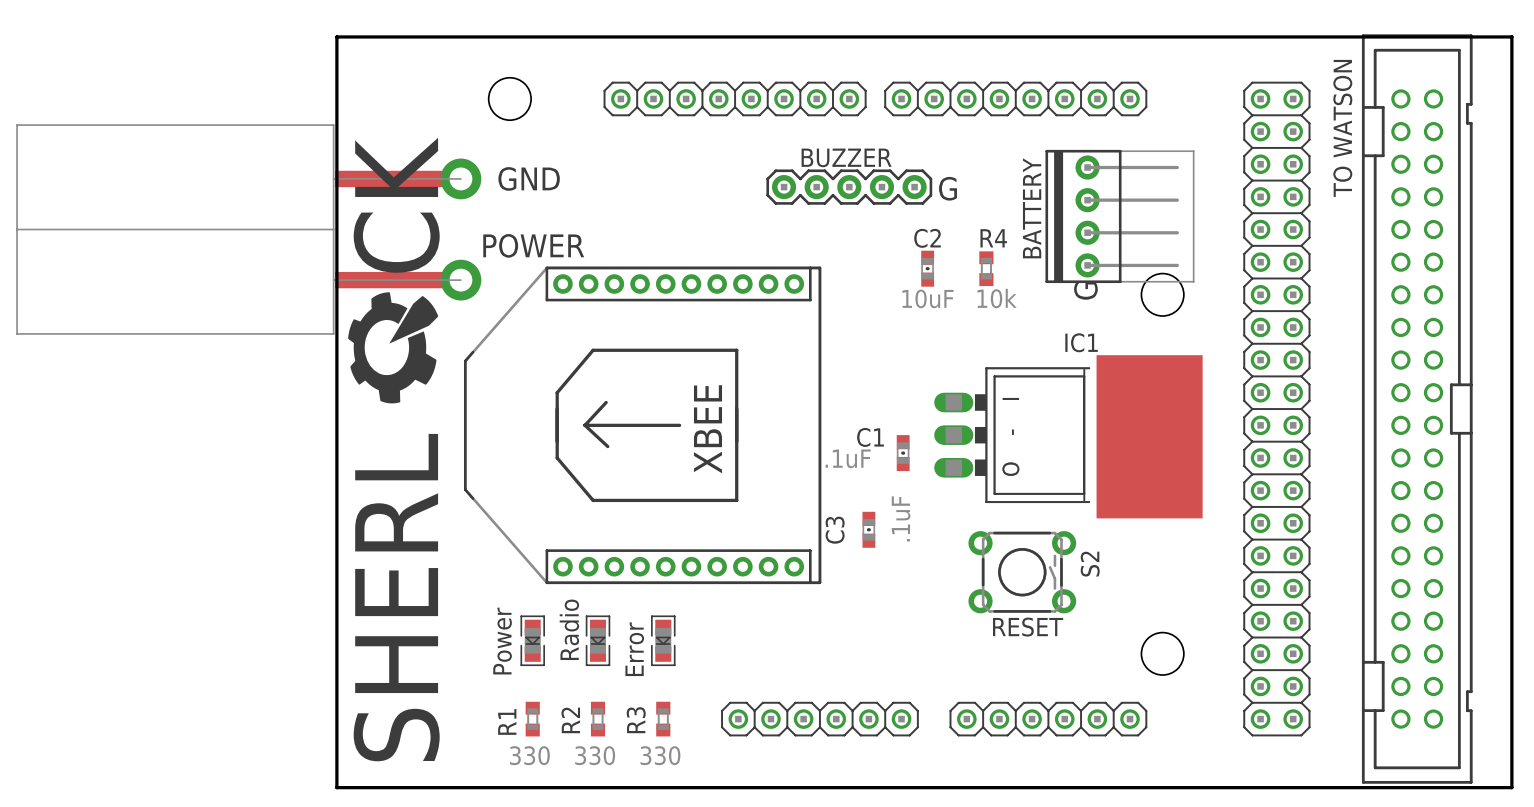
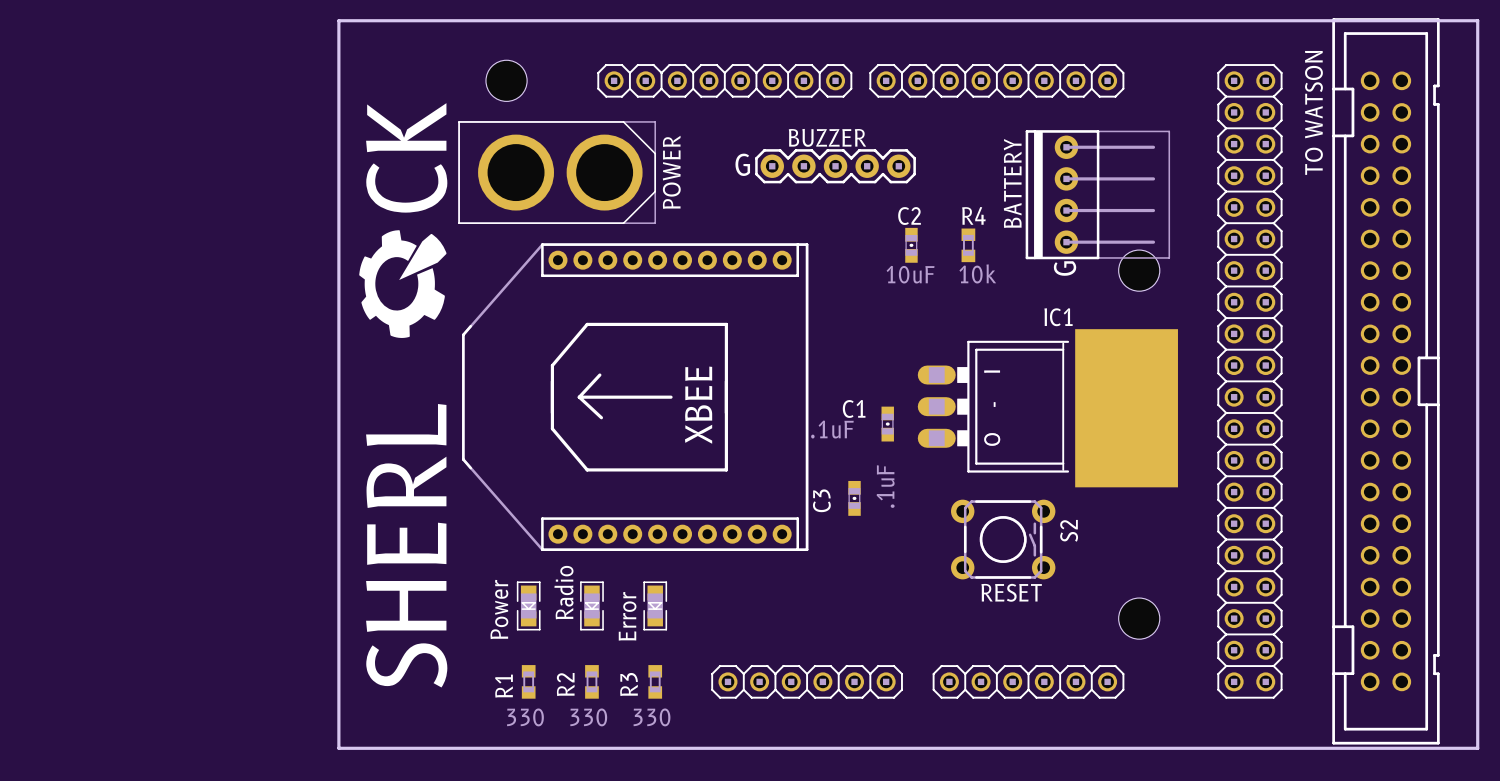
text: GND (529, 178) -> none
text position: G (948, 188) -> G (742, 164)
text: none -> POWER (671, 172)
part: none -> (557, 172)
POWER: (248, 229) -> none
drawing position: (393, 347) -> (402, 284)

